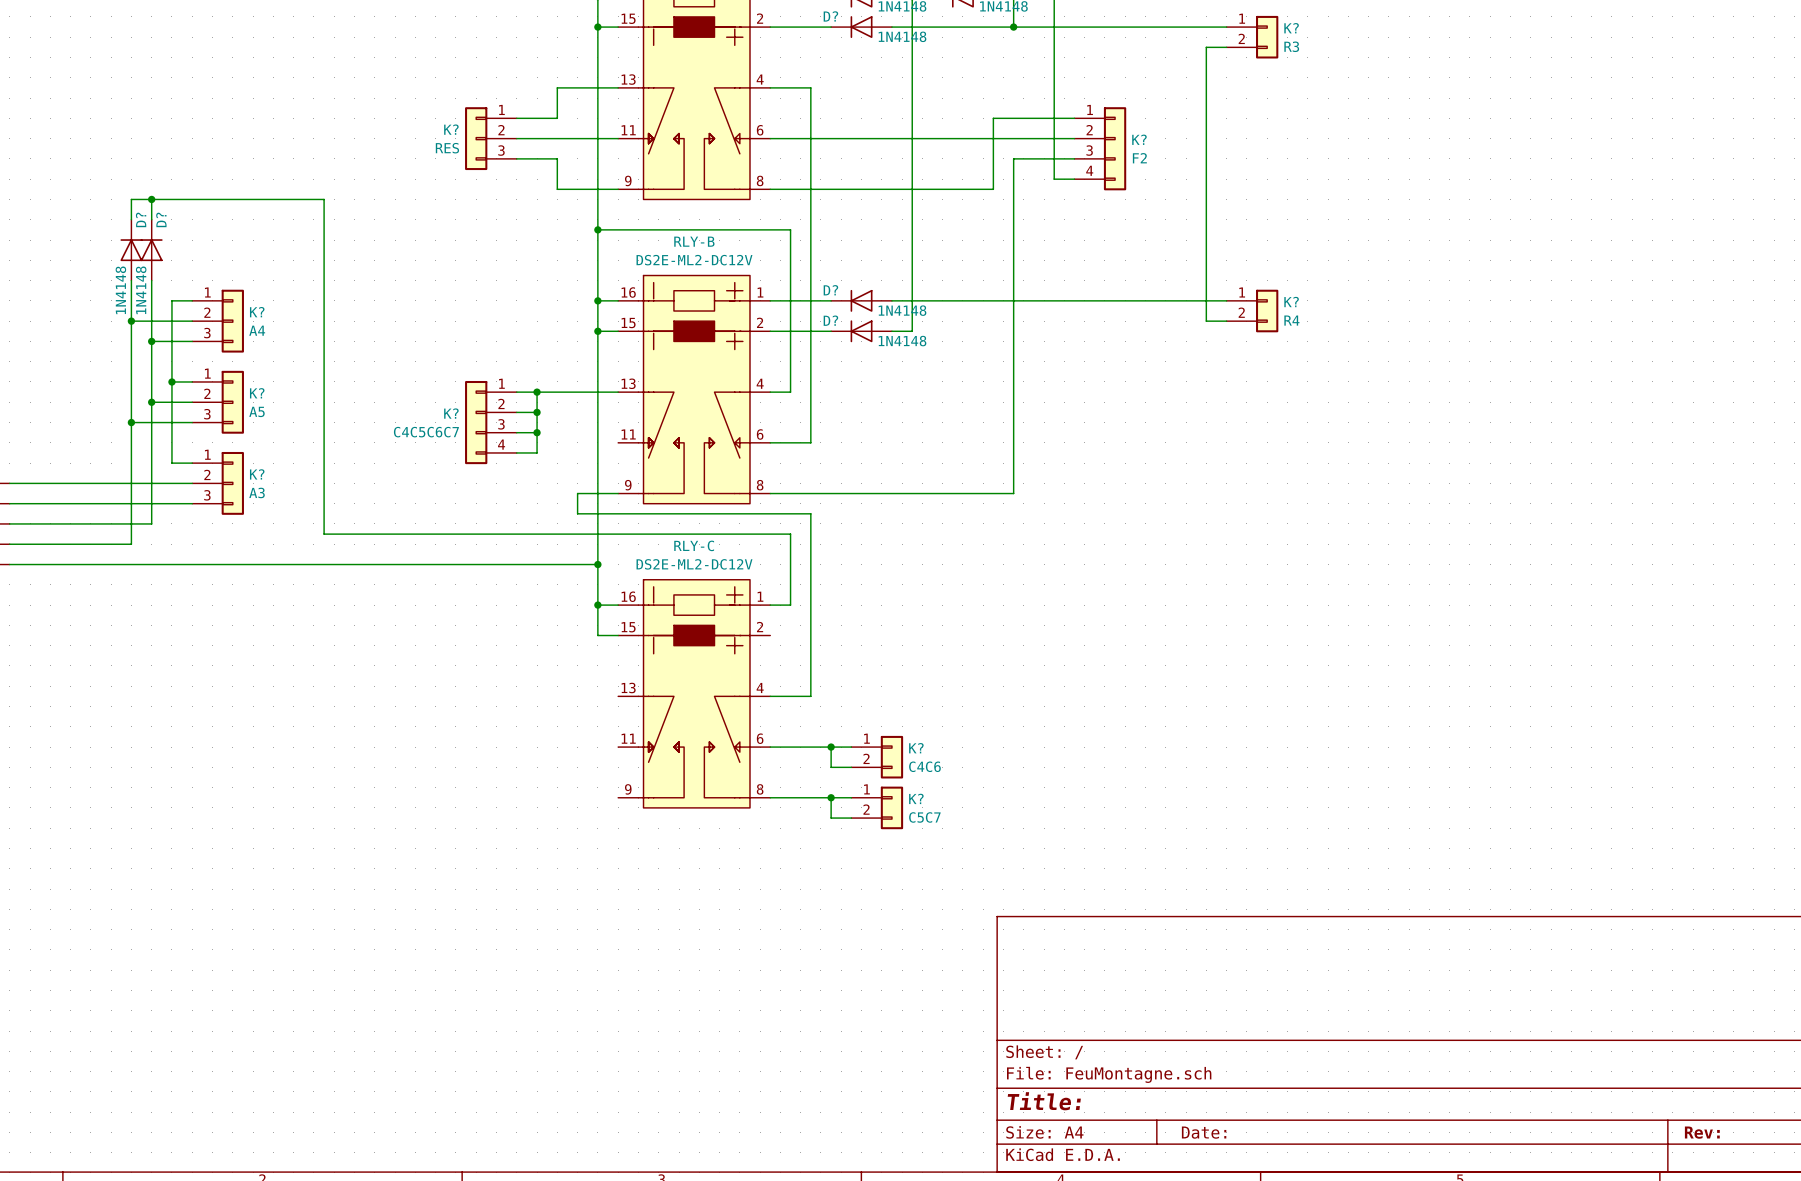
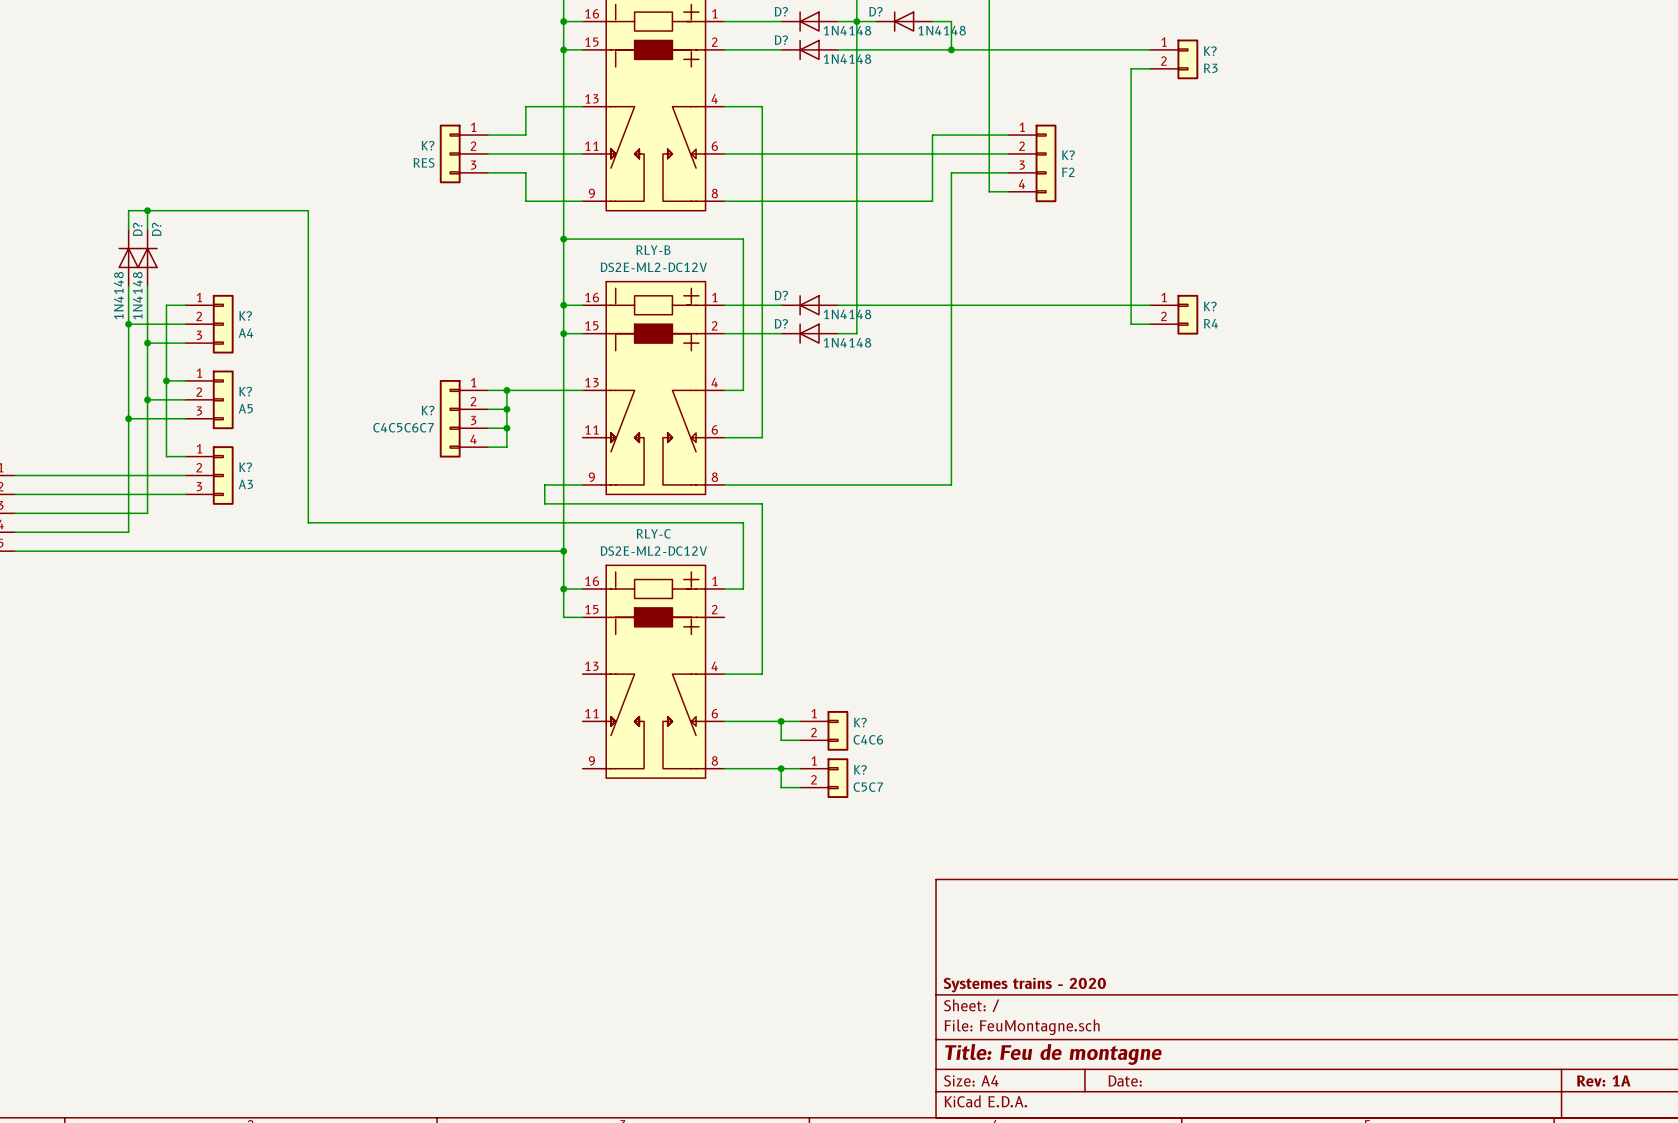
title block: none -> Systemes trains - 2020 (1024, 985)
title block: Title: (1044, 1101) -> Title: Feu de montagne (1053, 1054)
title block: Rev: (1702, 1132) -> Rev: 1A (1603, 1080)

